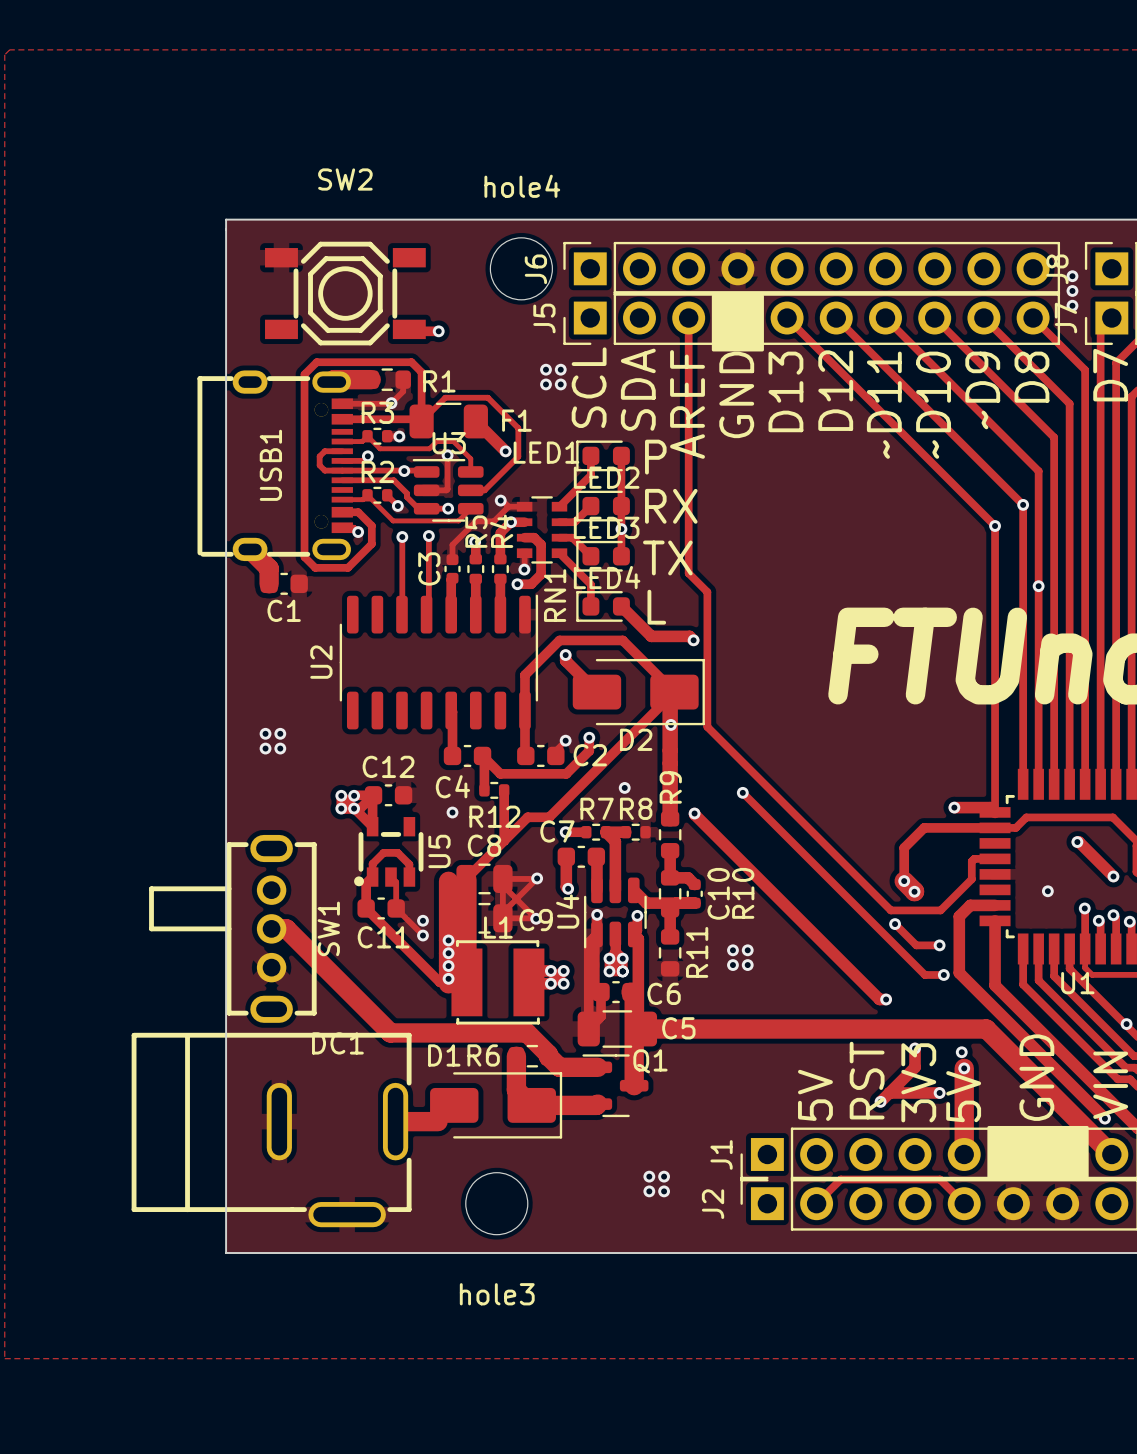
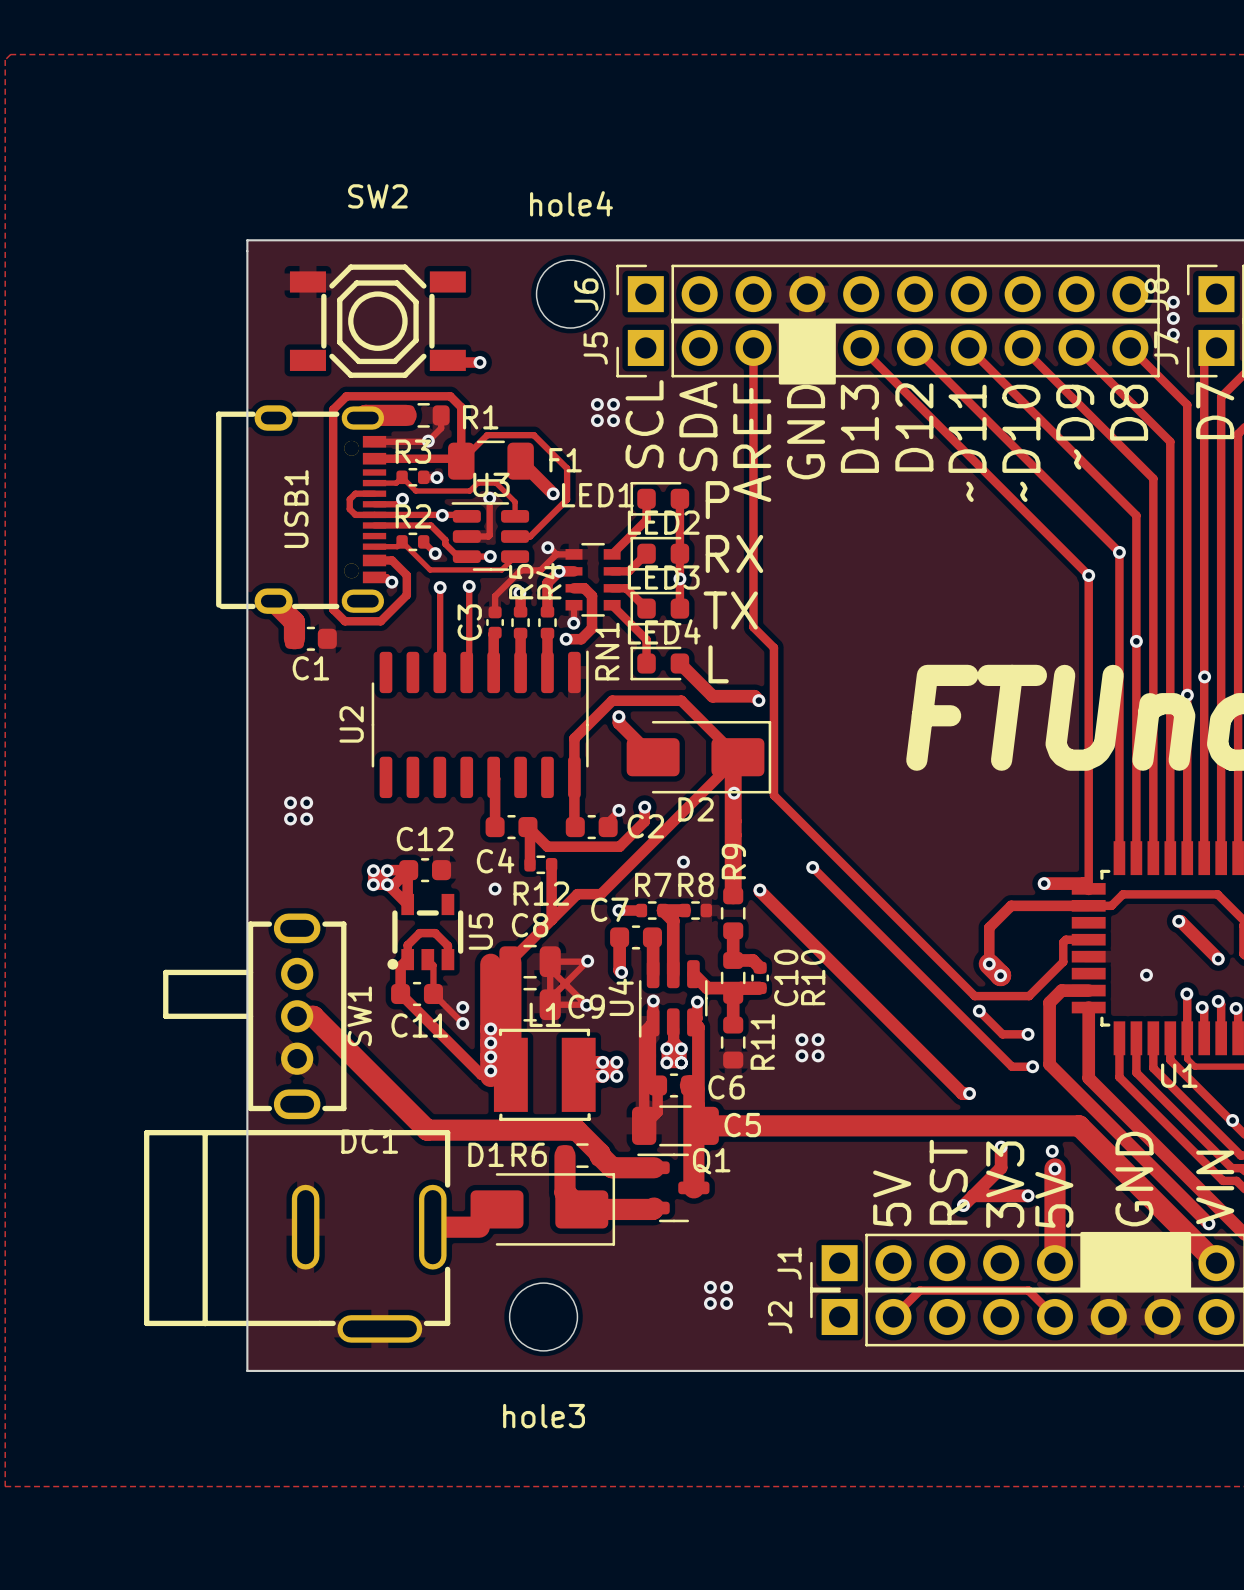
via: none -> (1204, 676)
via: none -> (1187, 695)

